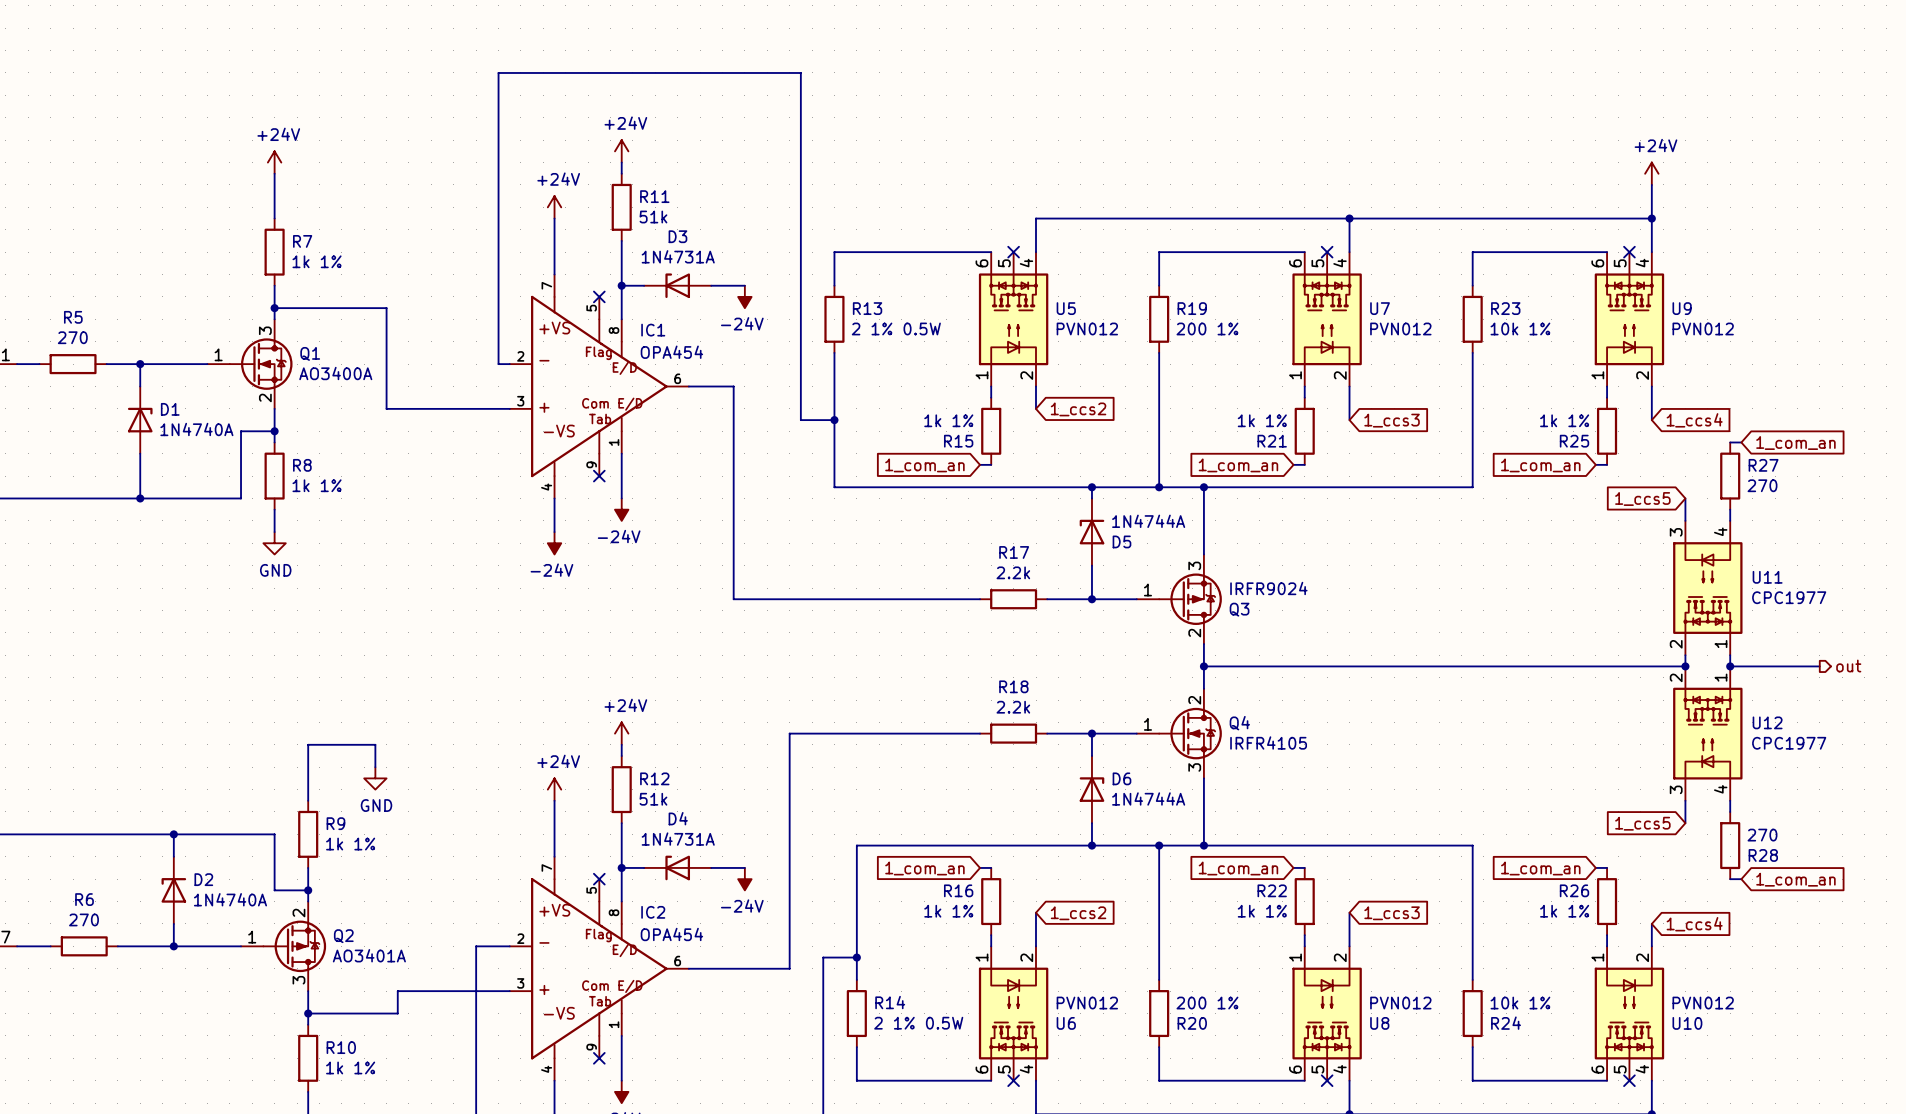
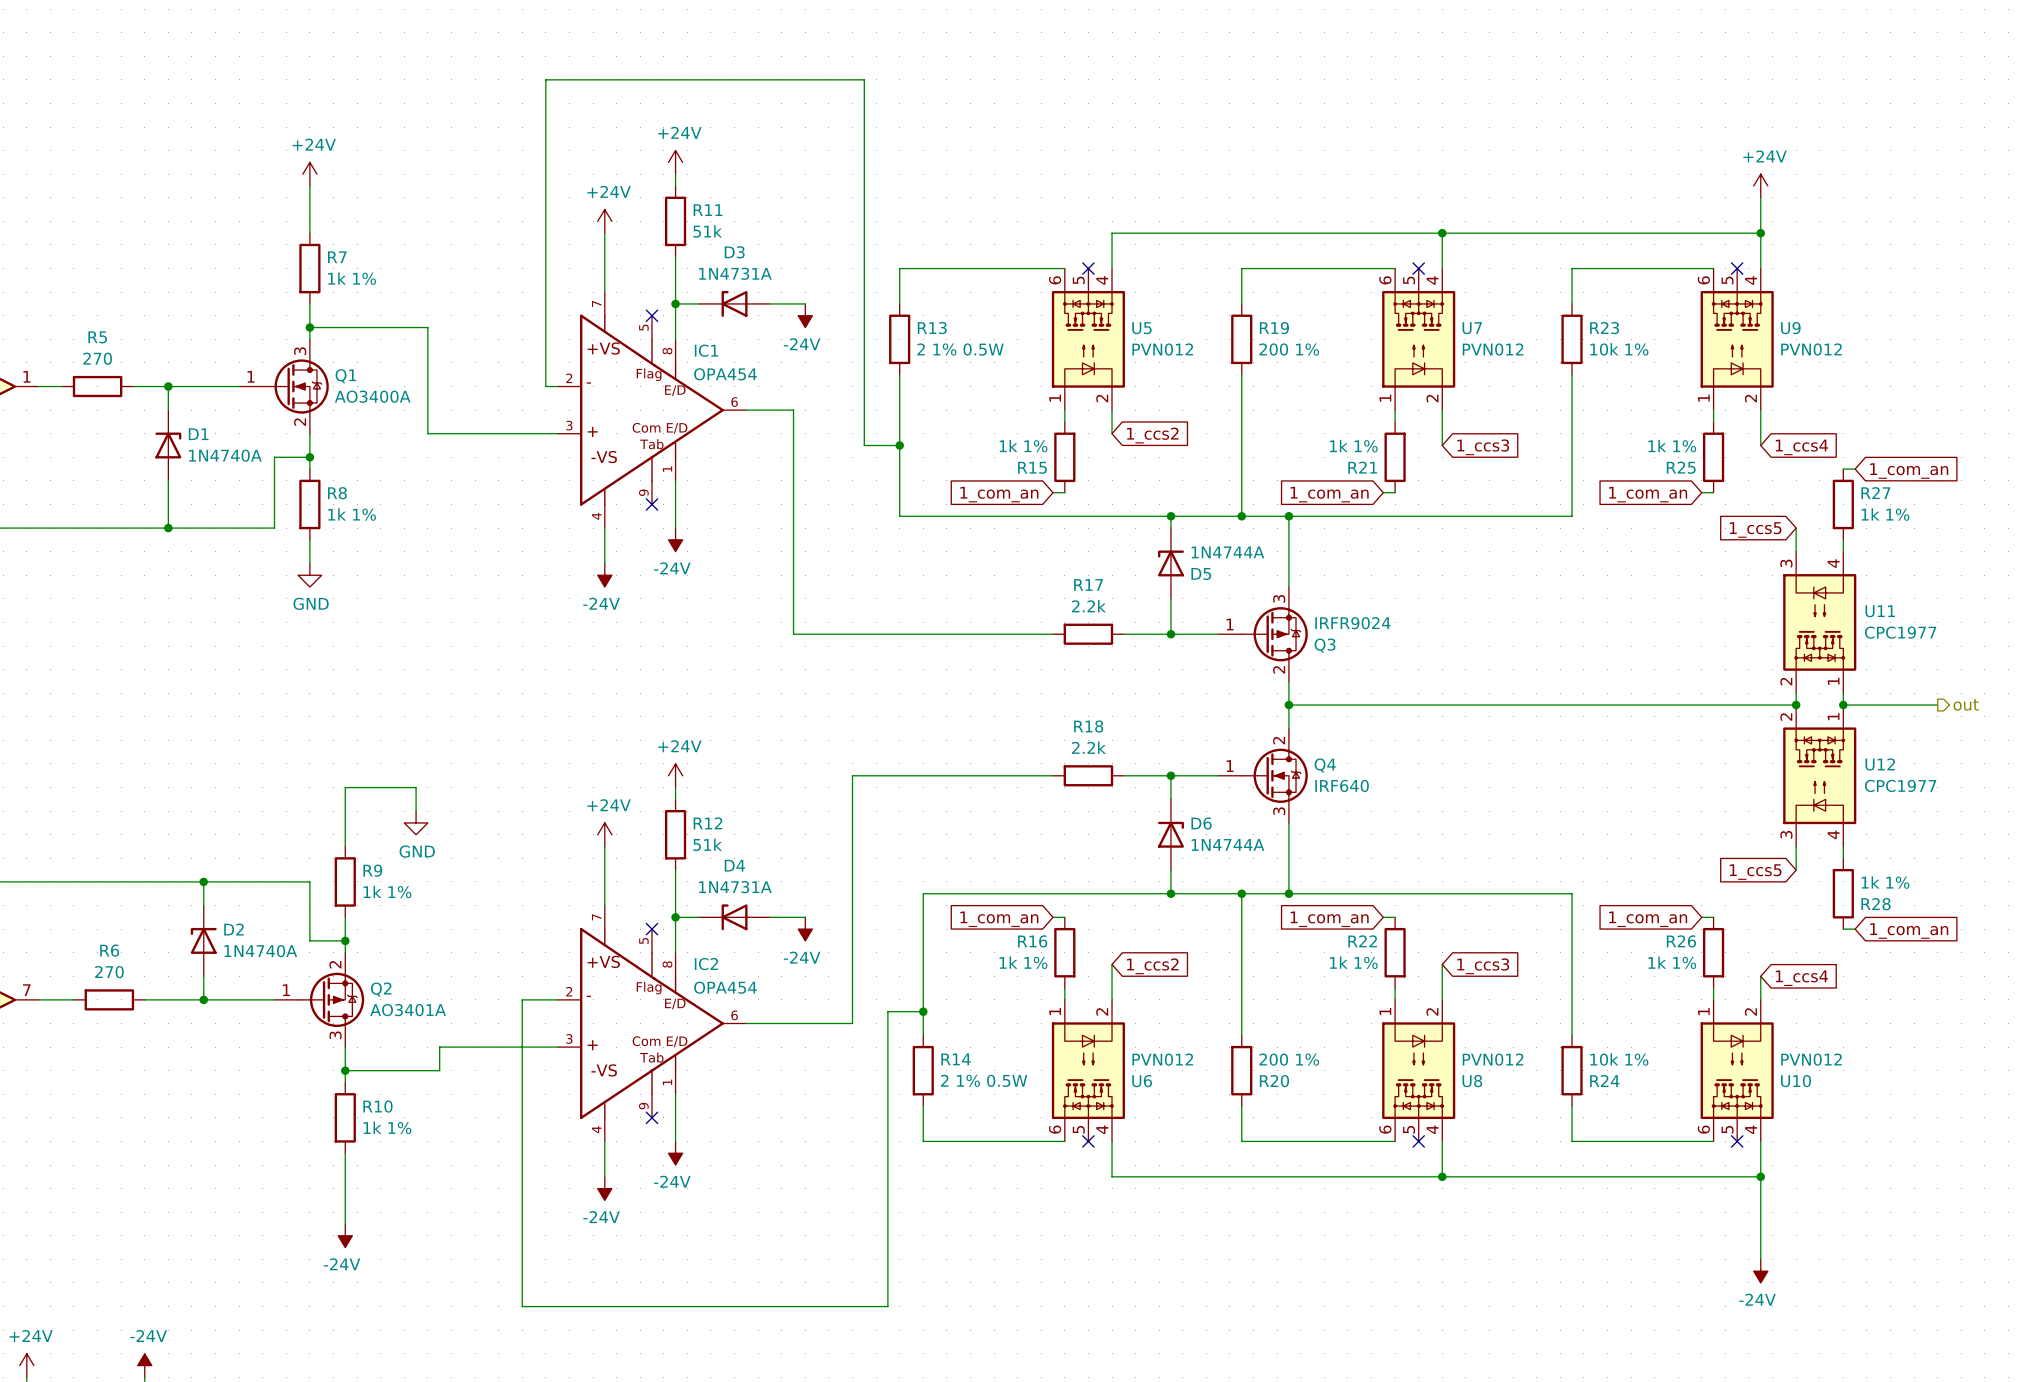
R27 value: 270 (1762, 485) -> 1k 1% (1885, 514)
Q4 value: IRFR4105 (1268, 743) -> IRF640 (1342, 785)
R28 value: 270 (1762, 835) -> 1k 1% (1885, 882)

